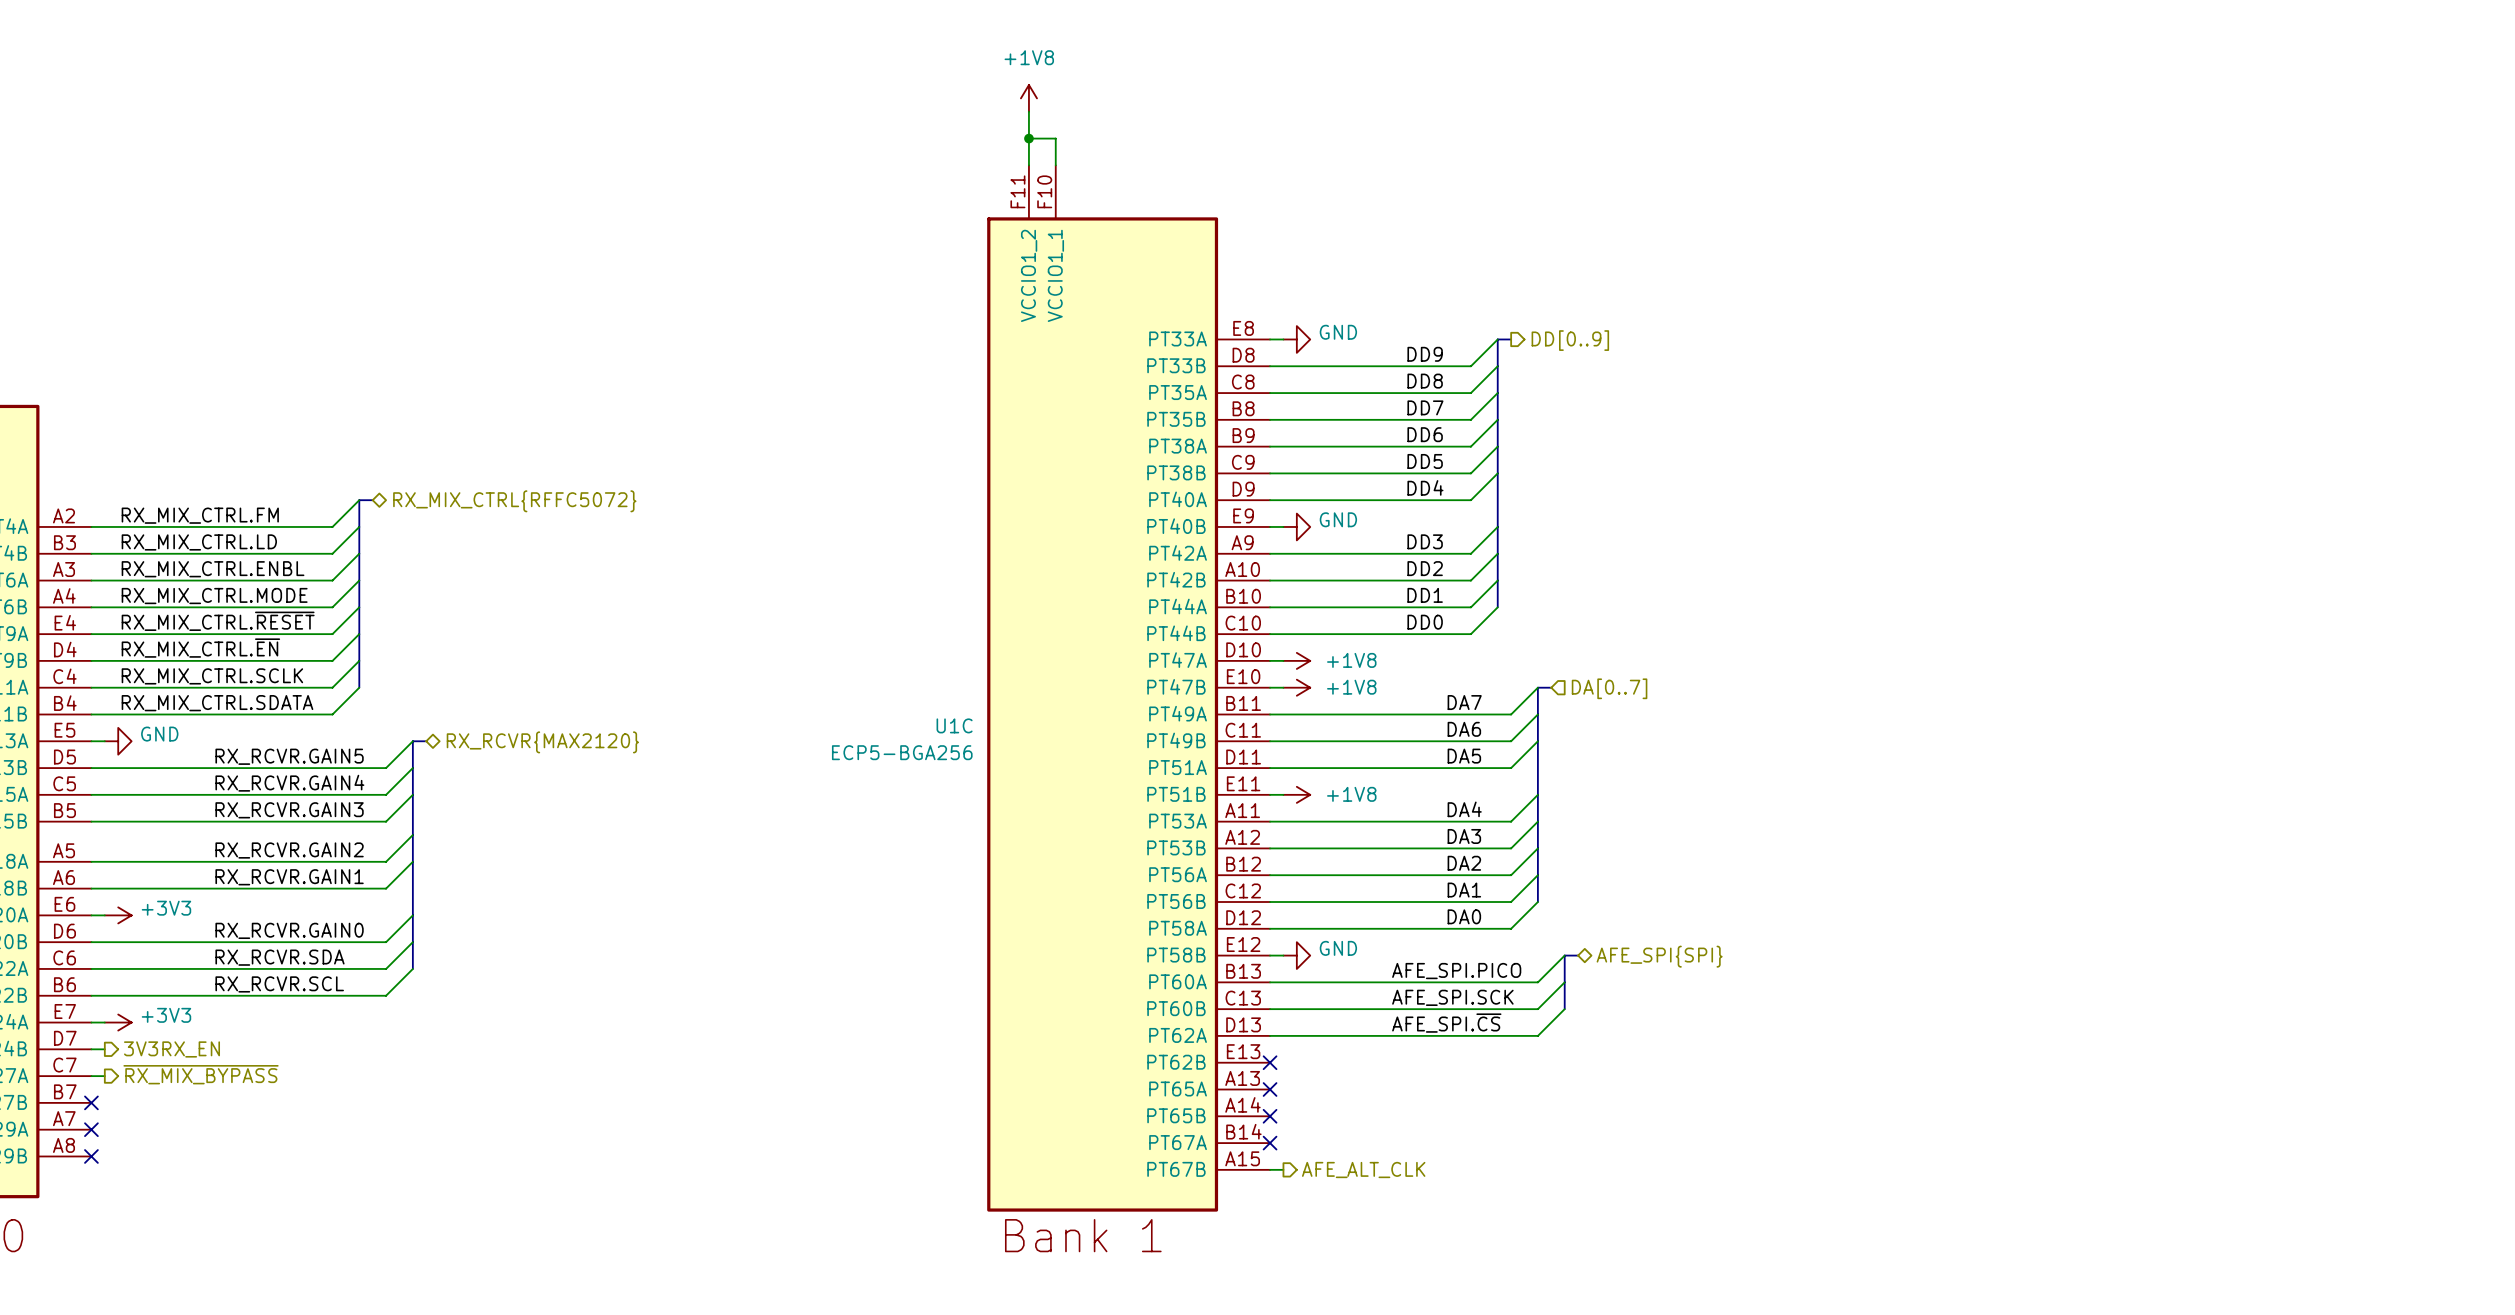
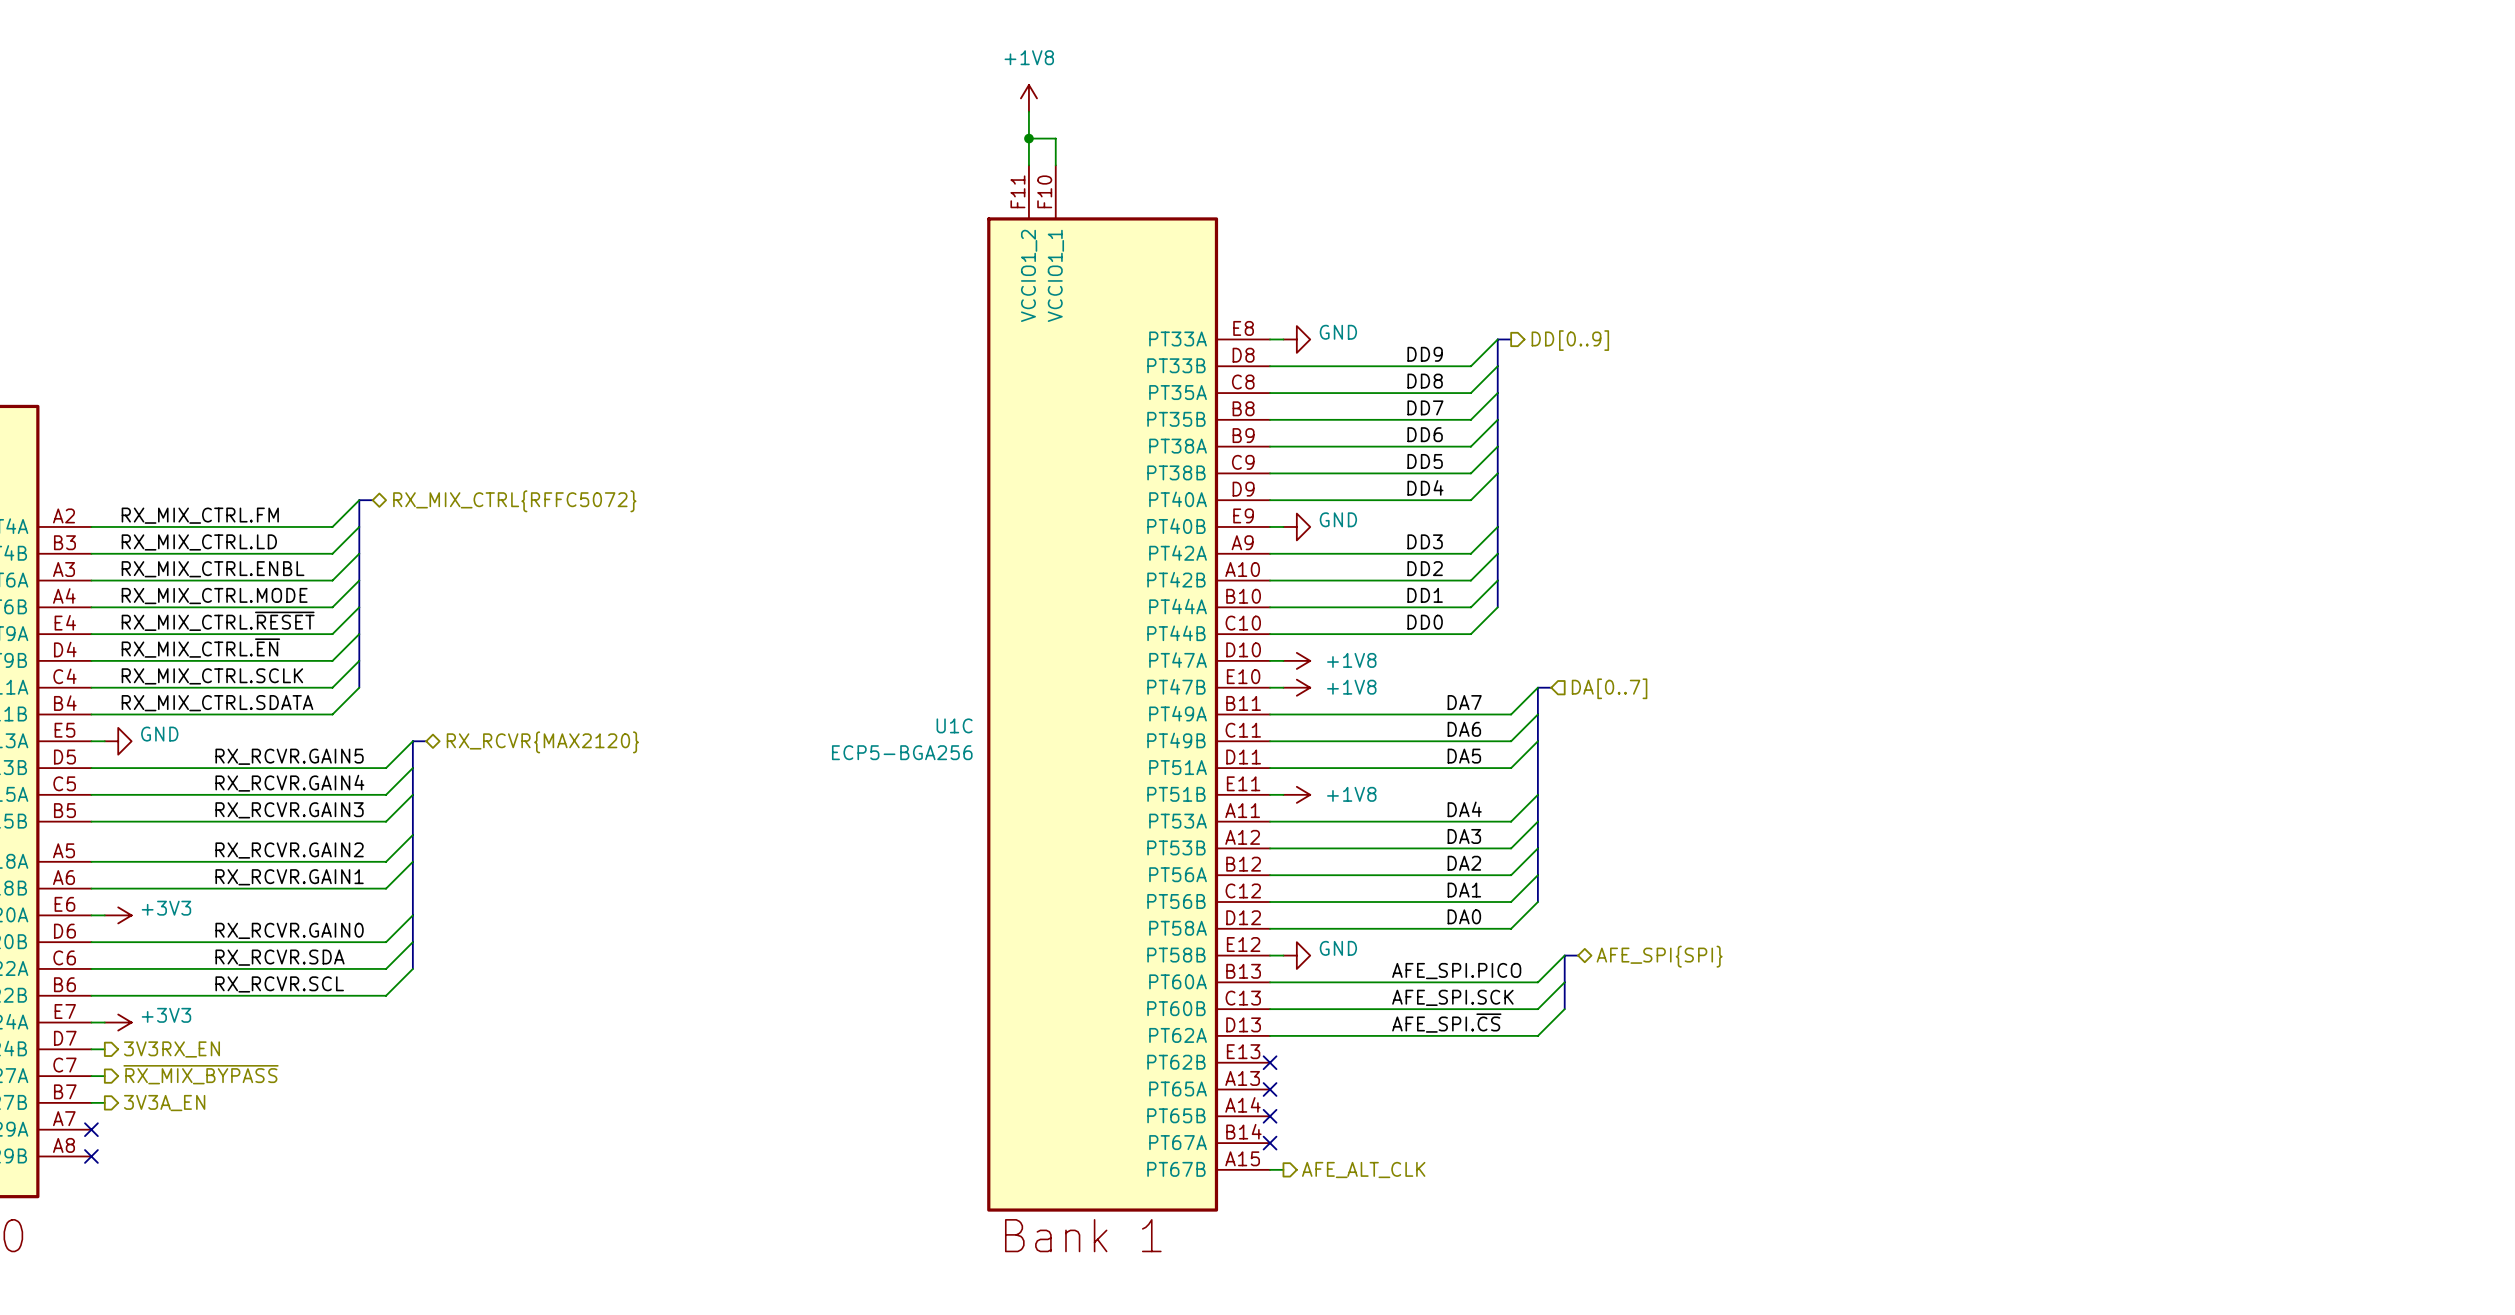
wire: none -> (91, 1102) (104, 1102)
no-connect mark: (91, 1102) -> none
hierarchical label: none -> 3V3A_EN (164, 1103)

